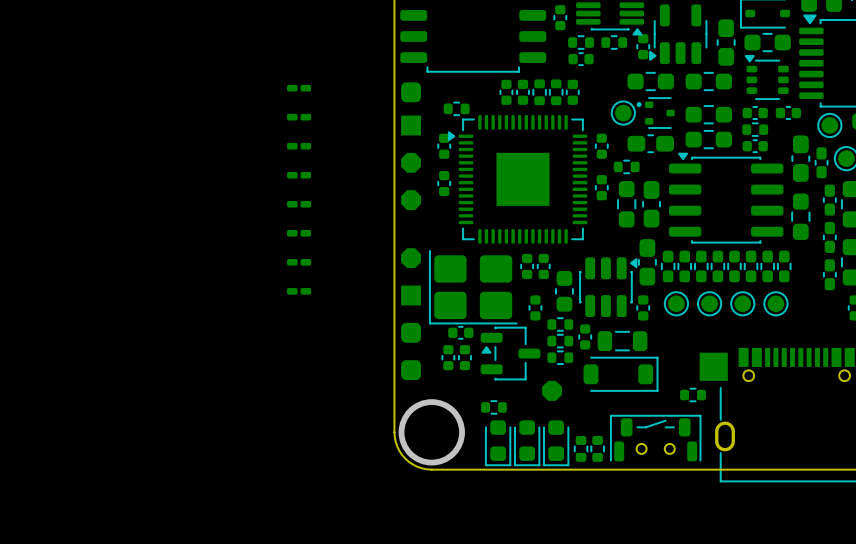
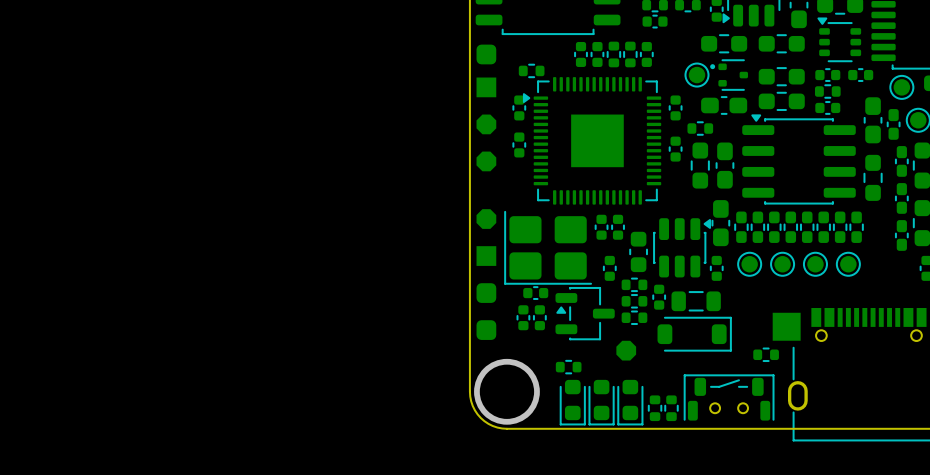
part: (299, 88) -> none
part: (299, 117) -> none
part: (299, 146) -> none
part: (299, 175) -> none
part: (299, 204) -> none
part: (299, 233) -> none
part: (299, 262) -> none
part: (299, 291) -> none

